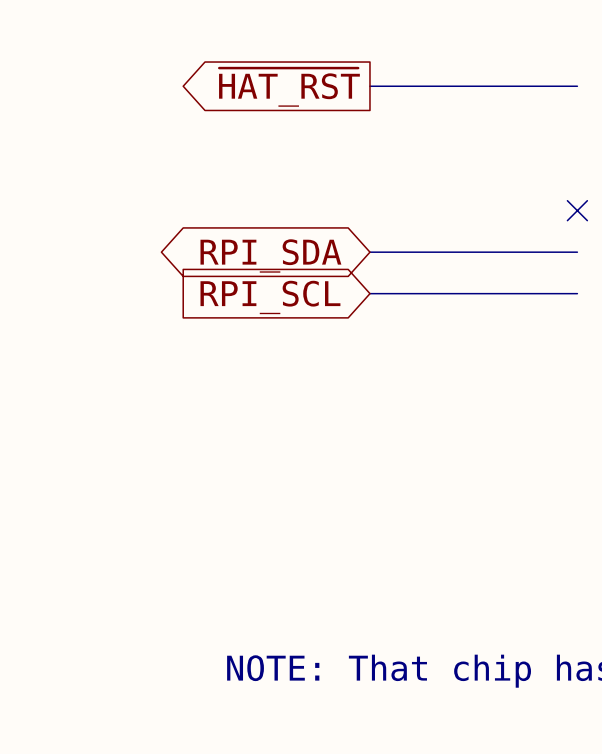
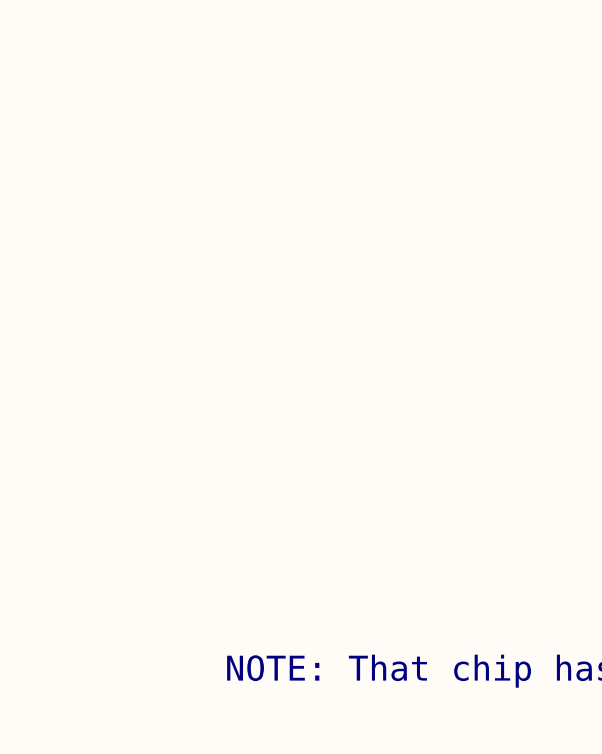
wire: (369, 86) (577, 86) -> none
global label: ~{HAT_RST} (289, 87) -> none
no-connect mark: (577, 210) -> none
wire: (369, 252) (577, 252) -> none
global label: RPI_SDA (270, 255) -> none
wire: (369, 293) (577, 293) -> none
global label: RPI_SCL (270, 297) -> none

